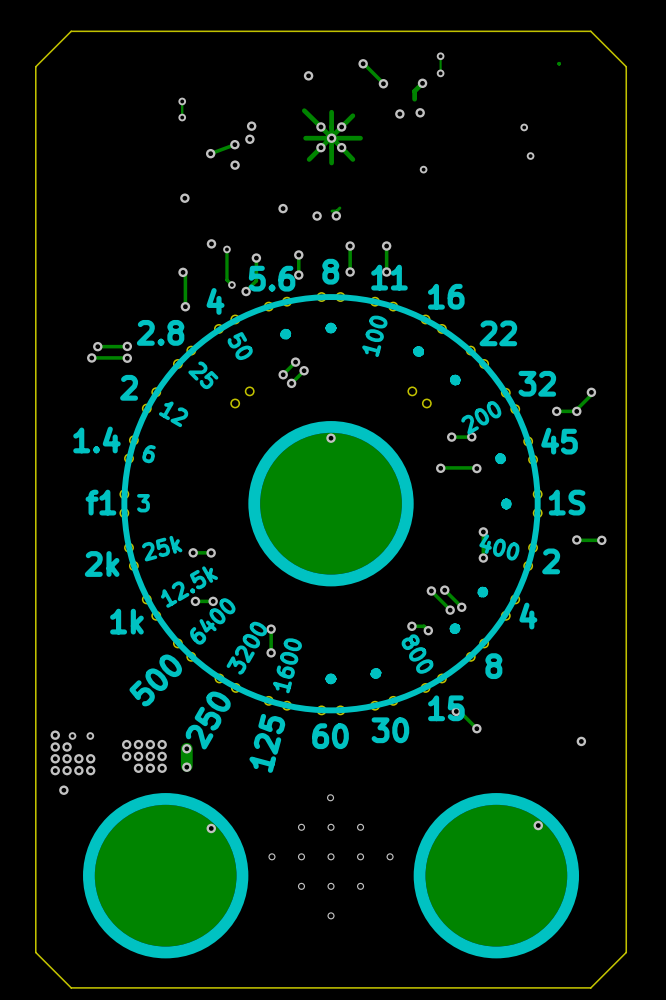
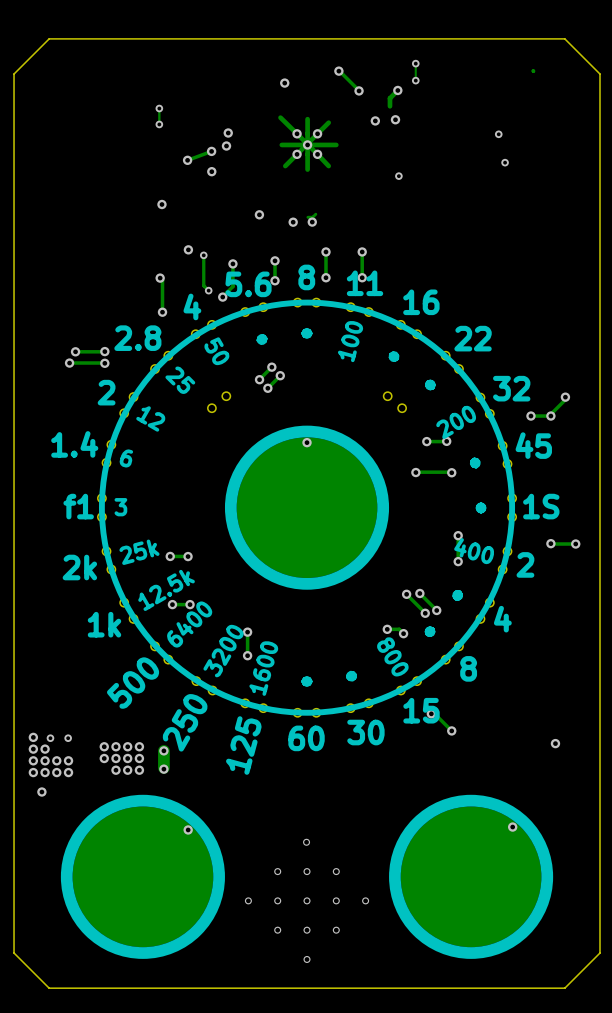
via: (330, 797) -> none
via: (301, 827) -> none
via: (331, 827) -> none
via: (360, 827) -> none
via: none -> (306, 842)
via: (271, 856) -> none
via: (301, 856) -> none
via: (331, 856) -> none
via: (360, 856) -> none
via: (390, 856) -> none
via: none -> (277, 871)
via: none -> (307, 871)
via: none -> (336, 871)
via: (301, 886) -> none
via: (331, 886) -> none
via: (360, 886) -> none
via: none -> (248, 900)
via: none -> (277, 900)
via: none -> (307, 900)
via: none -> (336, 900)
via: none -> (365, 900)
via: (331, 915) -> none
via: none -> (277, 930)
via: none -> (307, 930)
via: none -> (336, 930)
via: none -> (307, 959)

